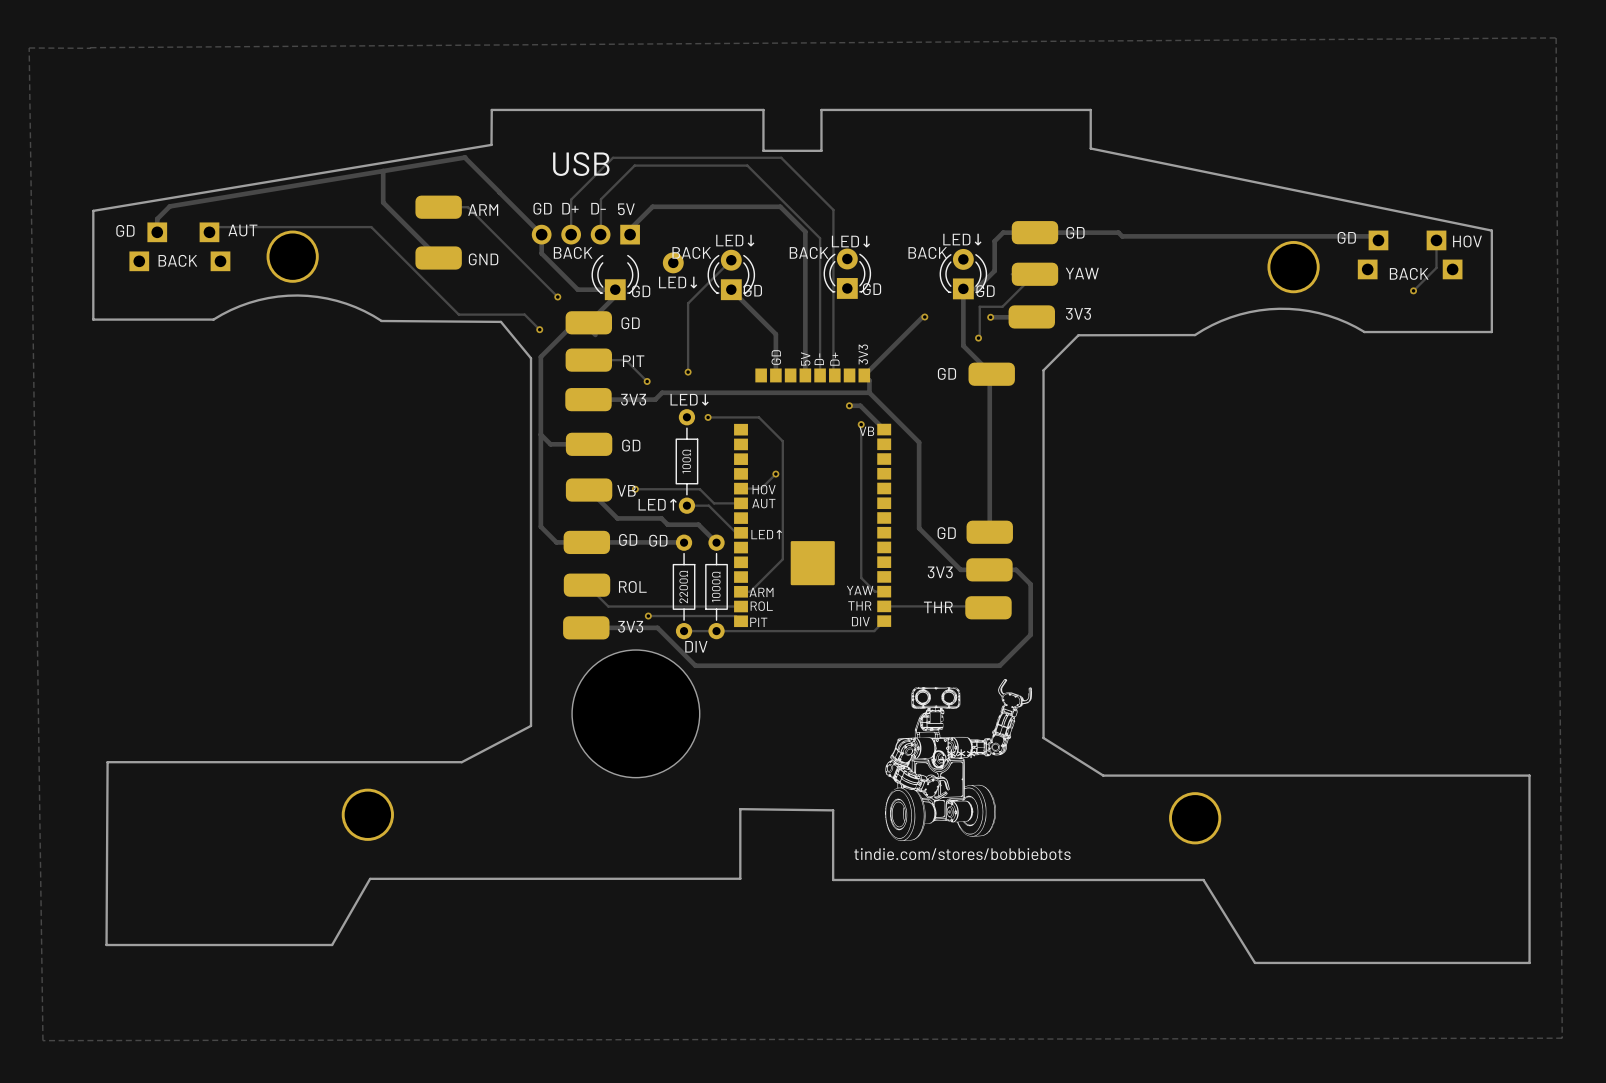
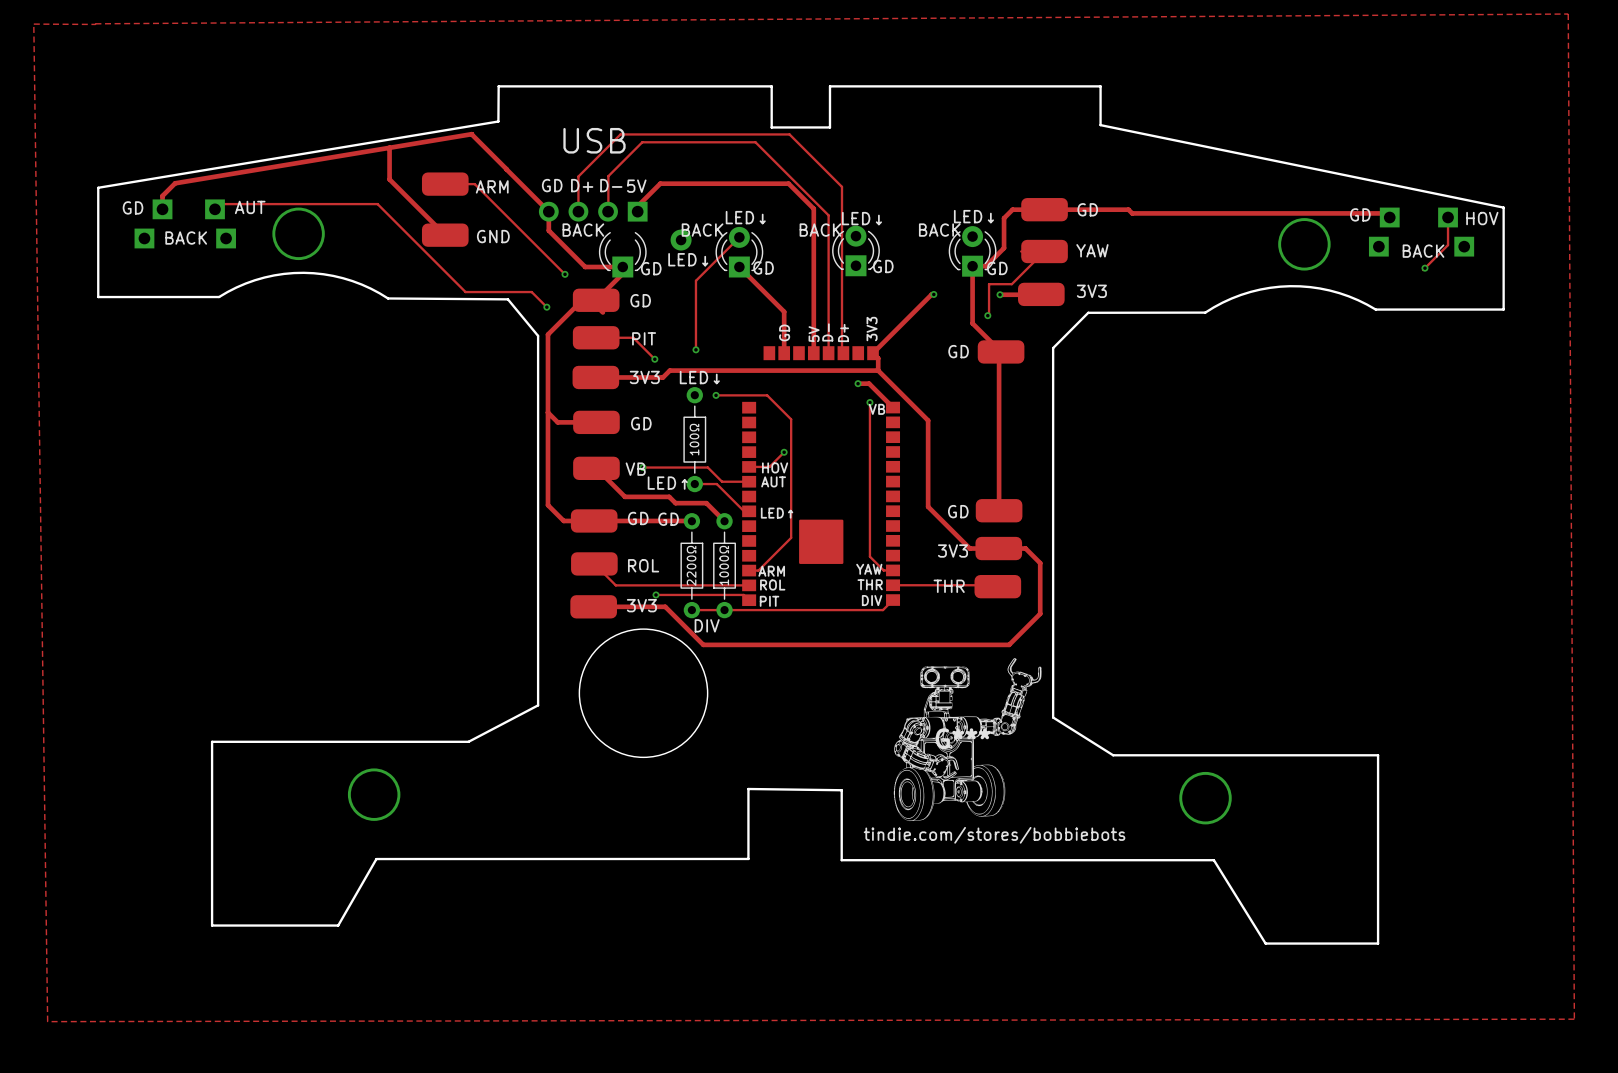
board edge: (206, 762) (107, 762) (106, 945) (206, 945) -> (212, 741) (212, 925)
board edge: (1366, 775) (1529, 775) (1529, 962) (1366, 962) -> (1378, 755) (1378, 943)

